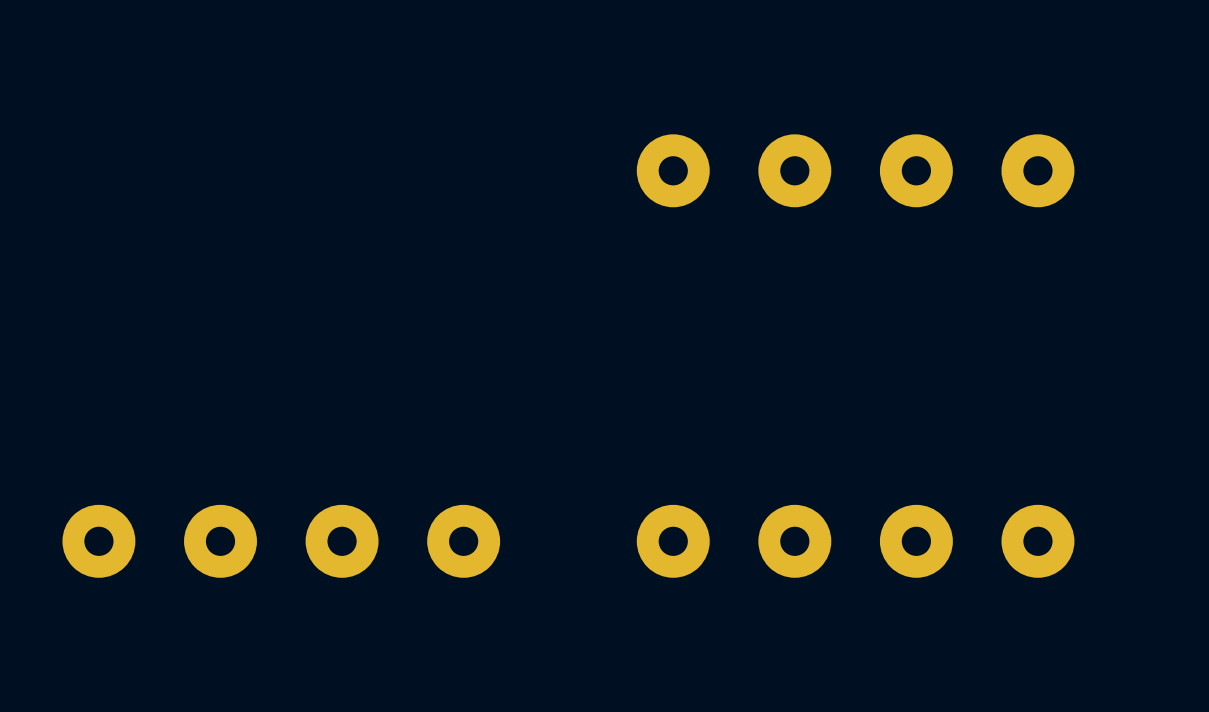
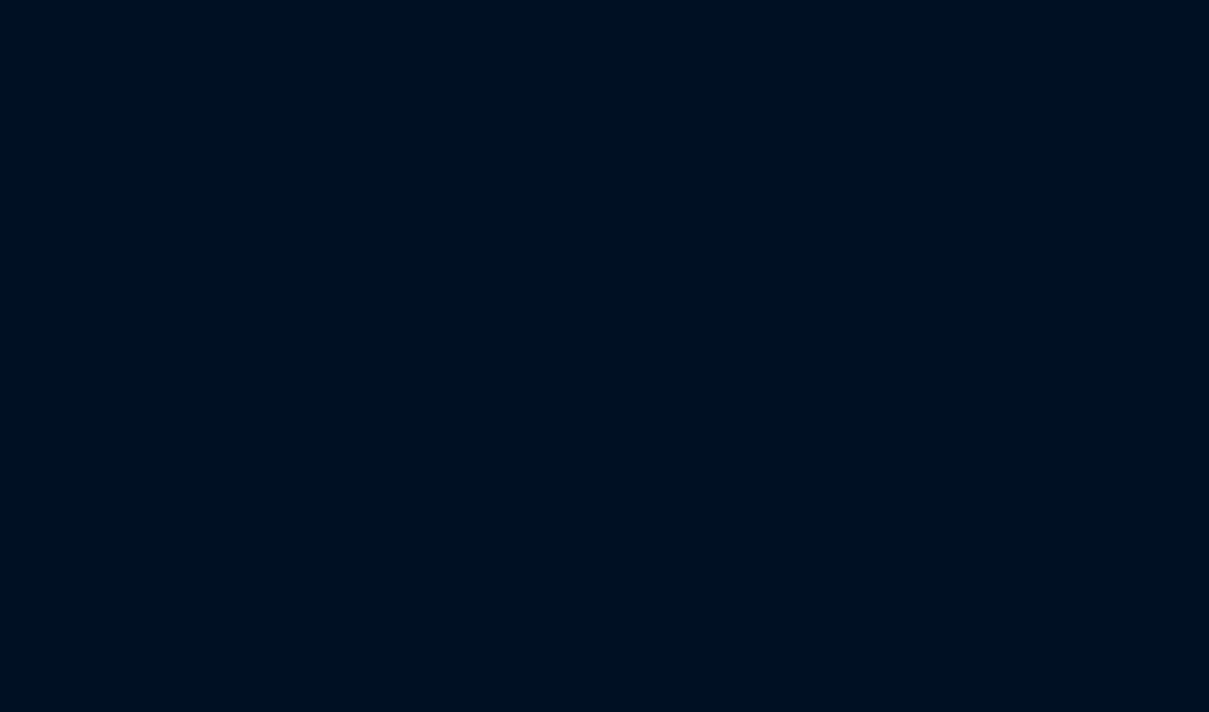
part: (855, 170) -> none
part: (281, 541) -> none
part: (855, 541) -> none

